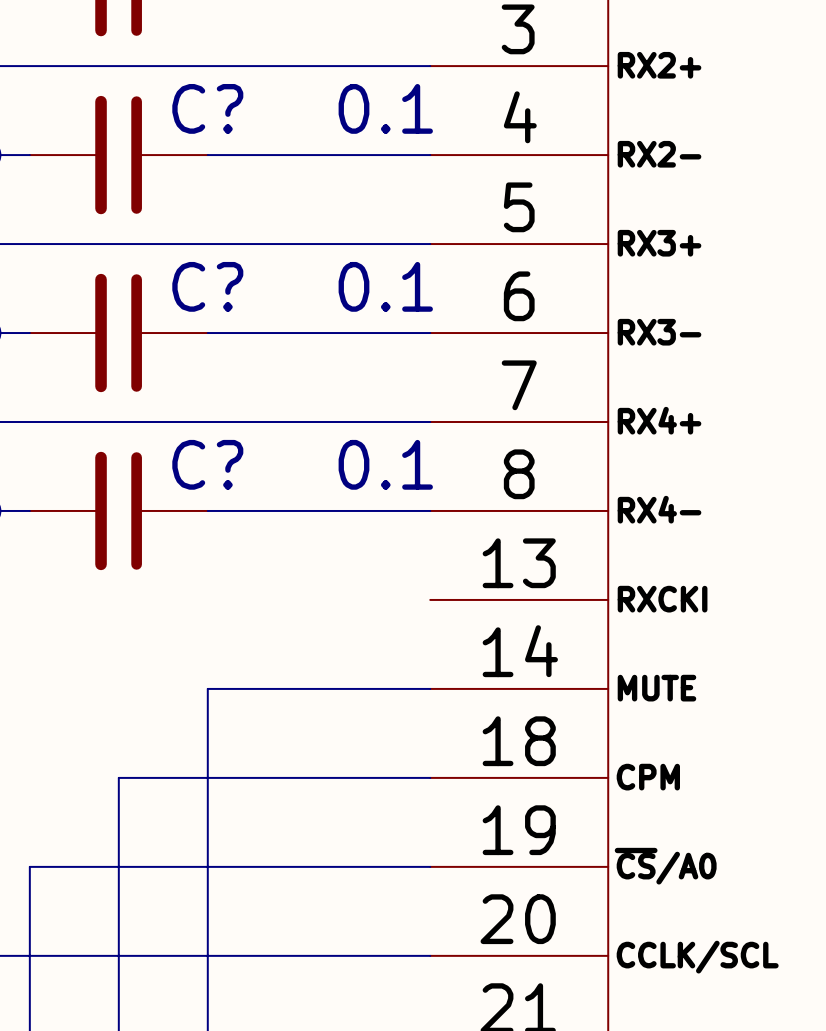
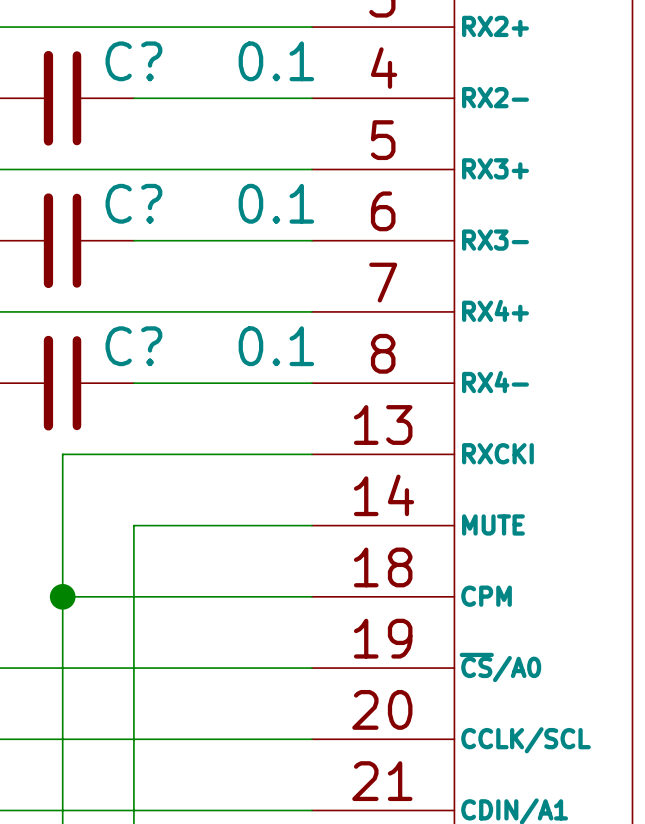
wire: none -> (311, 454) (62, 454) (62, 596)
junction: none -> (62, 596)

